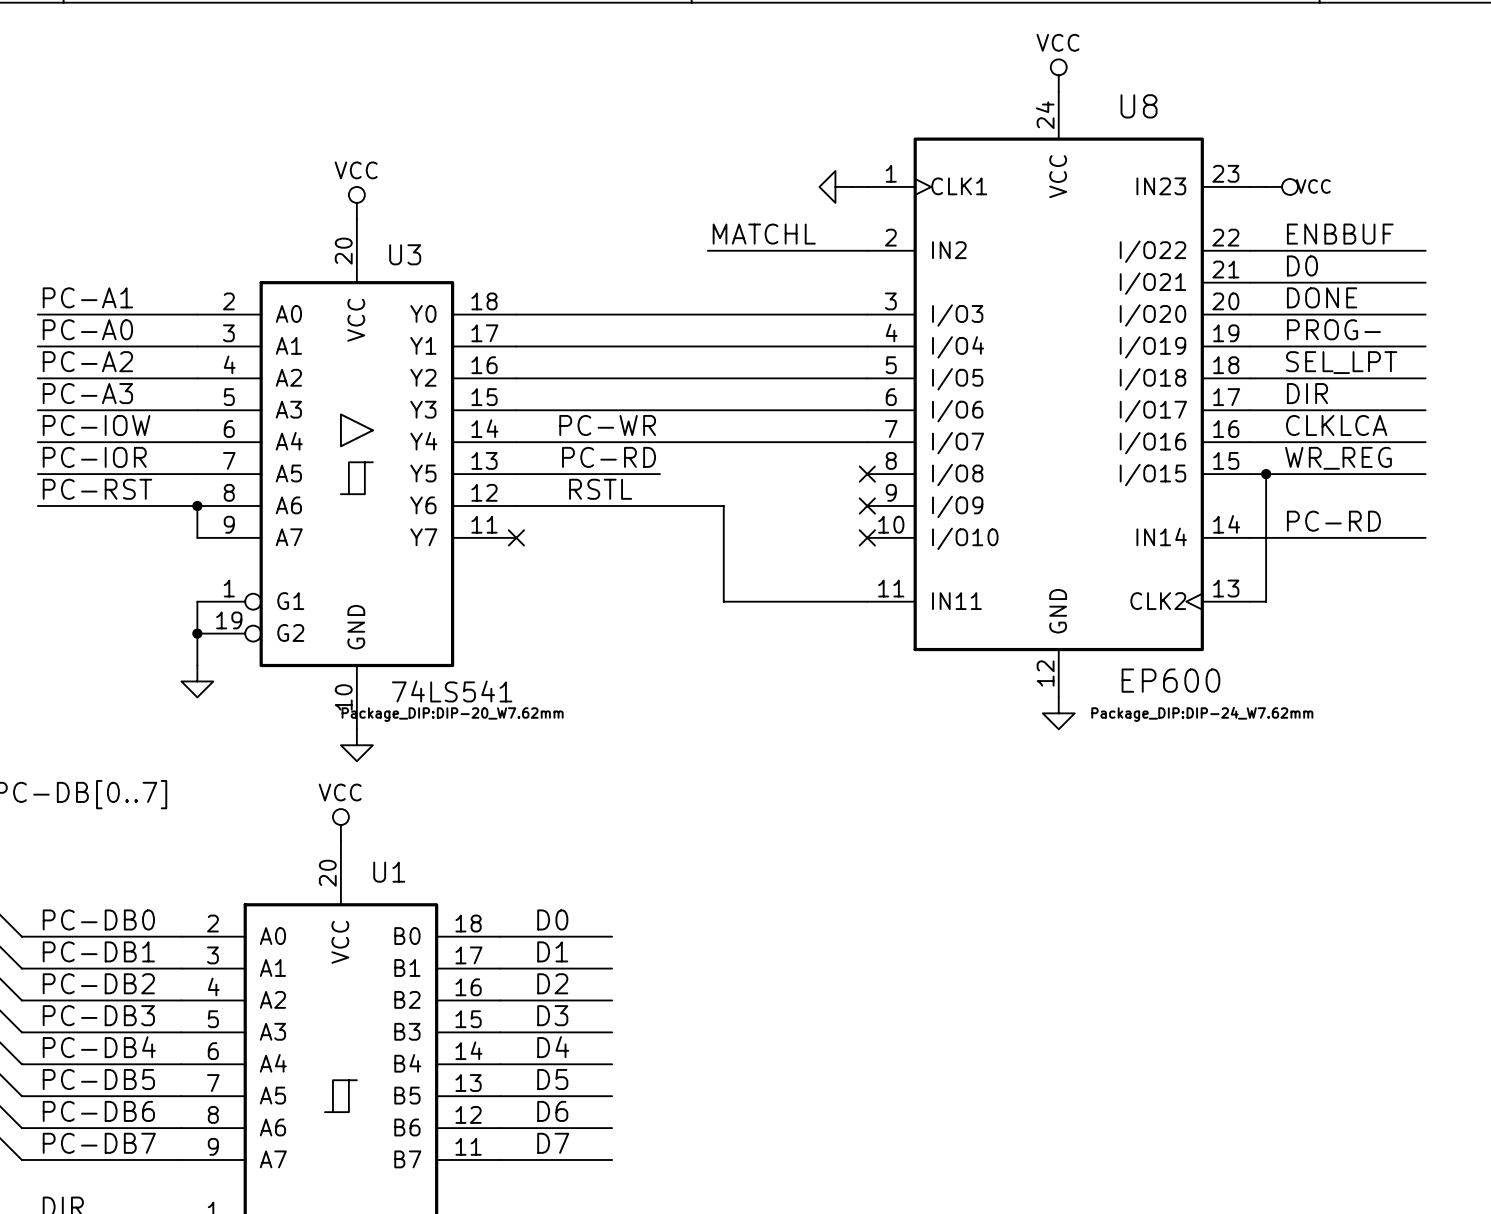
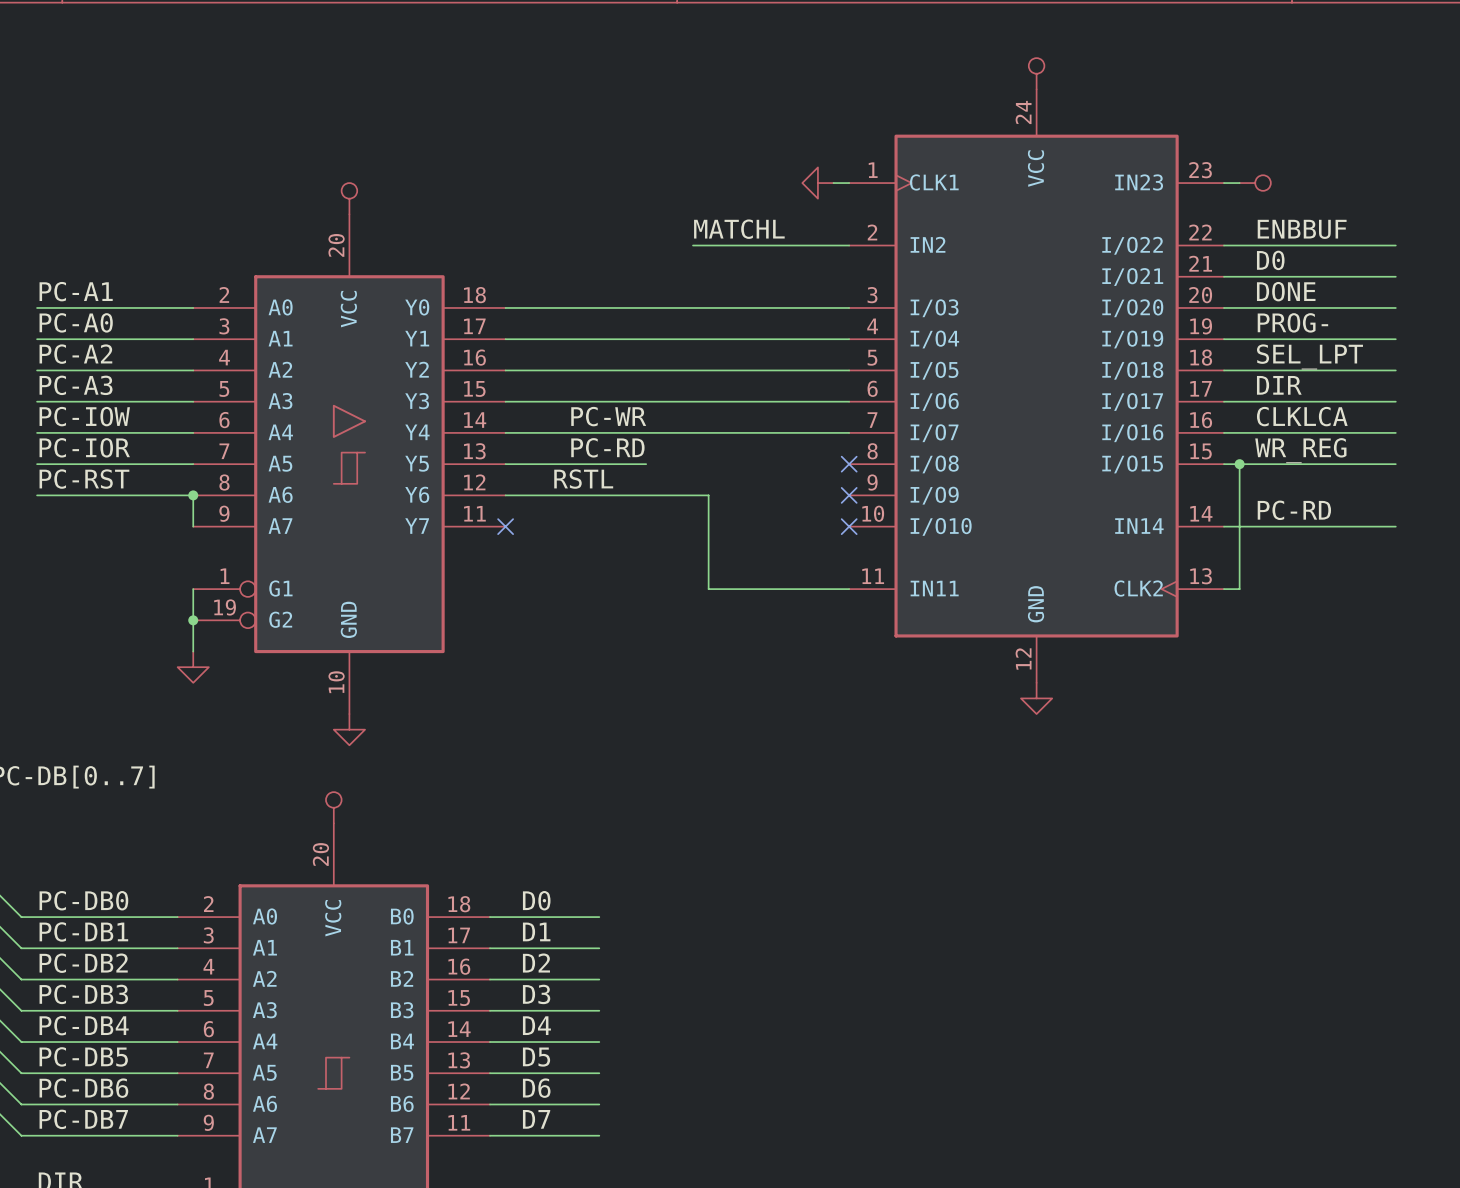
power symbol text: VCC (1057, 42) -> none
U8 name: U8 (1139, 106) -> none
power symbol text: VCC (356, 170) -> none
power symbol text: VCC (1313, 186) -> none
U3 name: U3 (405, 254) -> none
U8 value: EP600 (1170, 680) -> none
U3 value: 74LS541 (452, 691) -> none
U3 text: Package_DIP:DIP-20_W7.62mm (452, 714) -> none
U8 text: Package_DIP:DIP-24_W7.62mm (1202, 714) -> none
power symbol text: VCC (340, 792) -> none
U1 name: U1 (389, 872) -> none

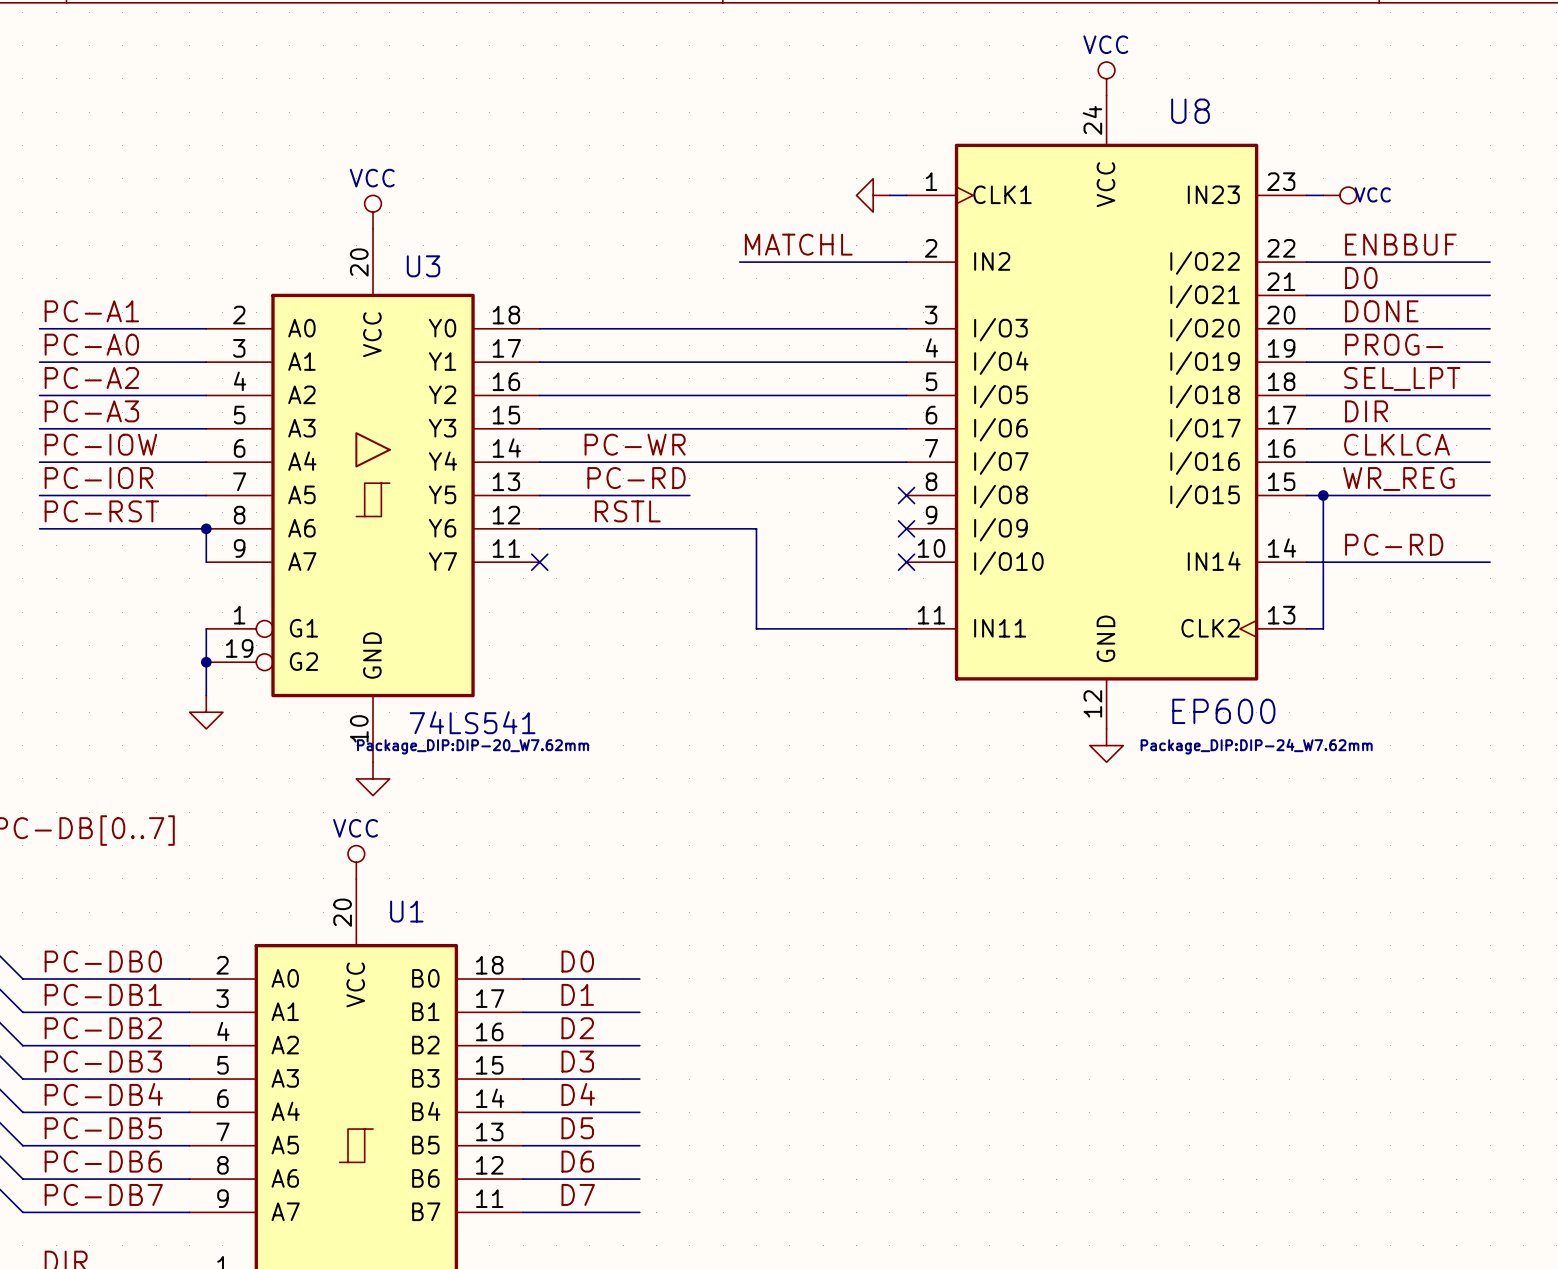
power symbol text: none -> VCC (1105, 44)
U8 name: none -> U8 (1190, 111)
power symbol text: none -> VCC (372, 178)
power symbol text: none -> VCC (1372, 194)
U3 name: none -> U3 (423, 266)
U8 value: none -> EP600 (1223, 711)
U3 value: none -> 74LS541 (472, 722)
U3 text: none -> Package_DIP:DIP-20_W7.62mm (473, 746)
U8 text: none -> Package_DIP:DIP-24_W7.62mm (1256, 746)
power symbol text: none -> VCC (355, 828)
U1 name: none -> U1 (406, 911)

